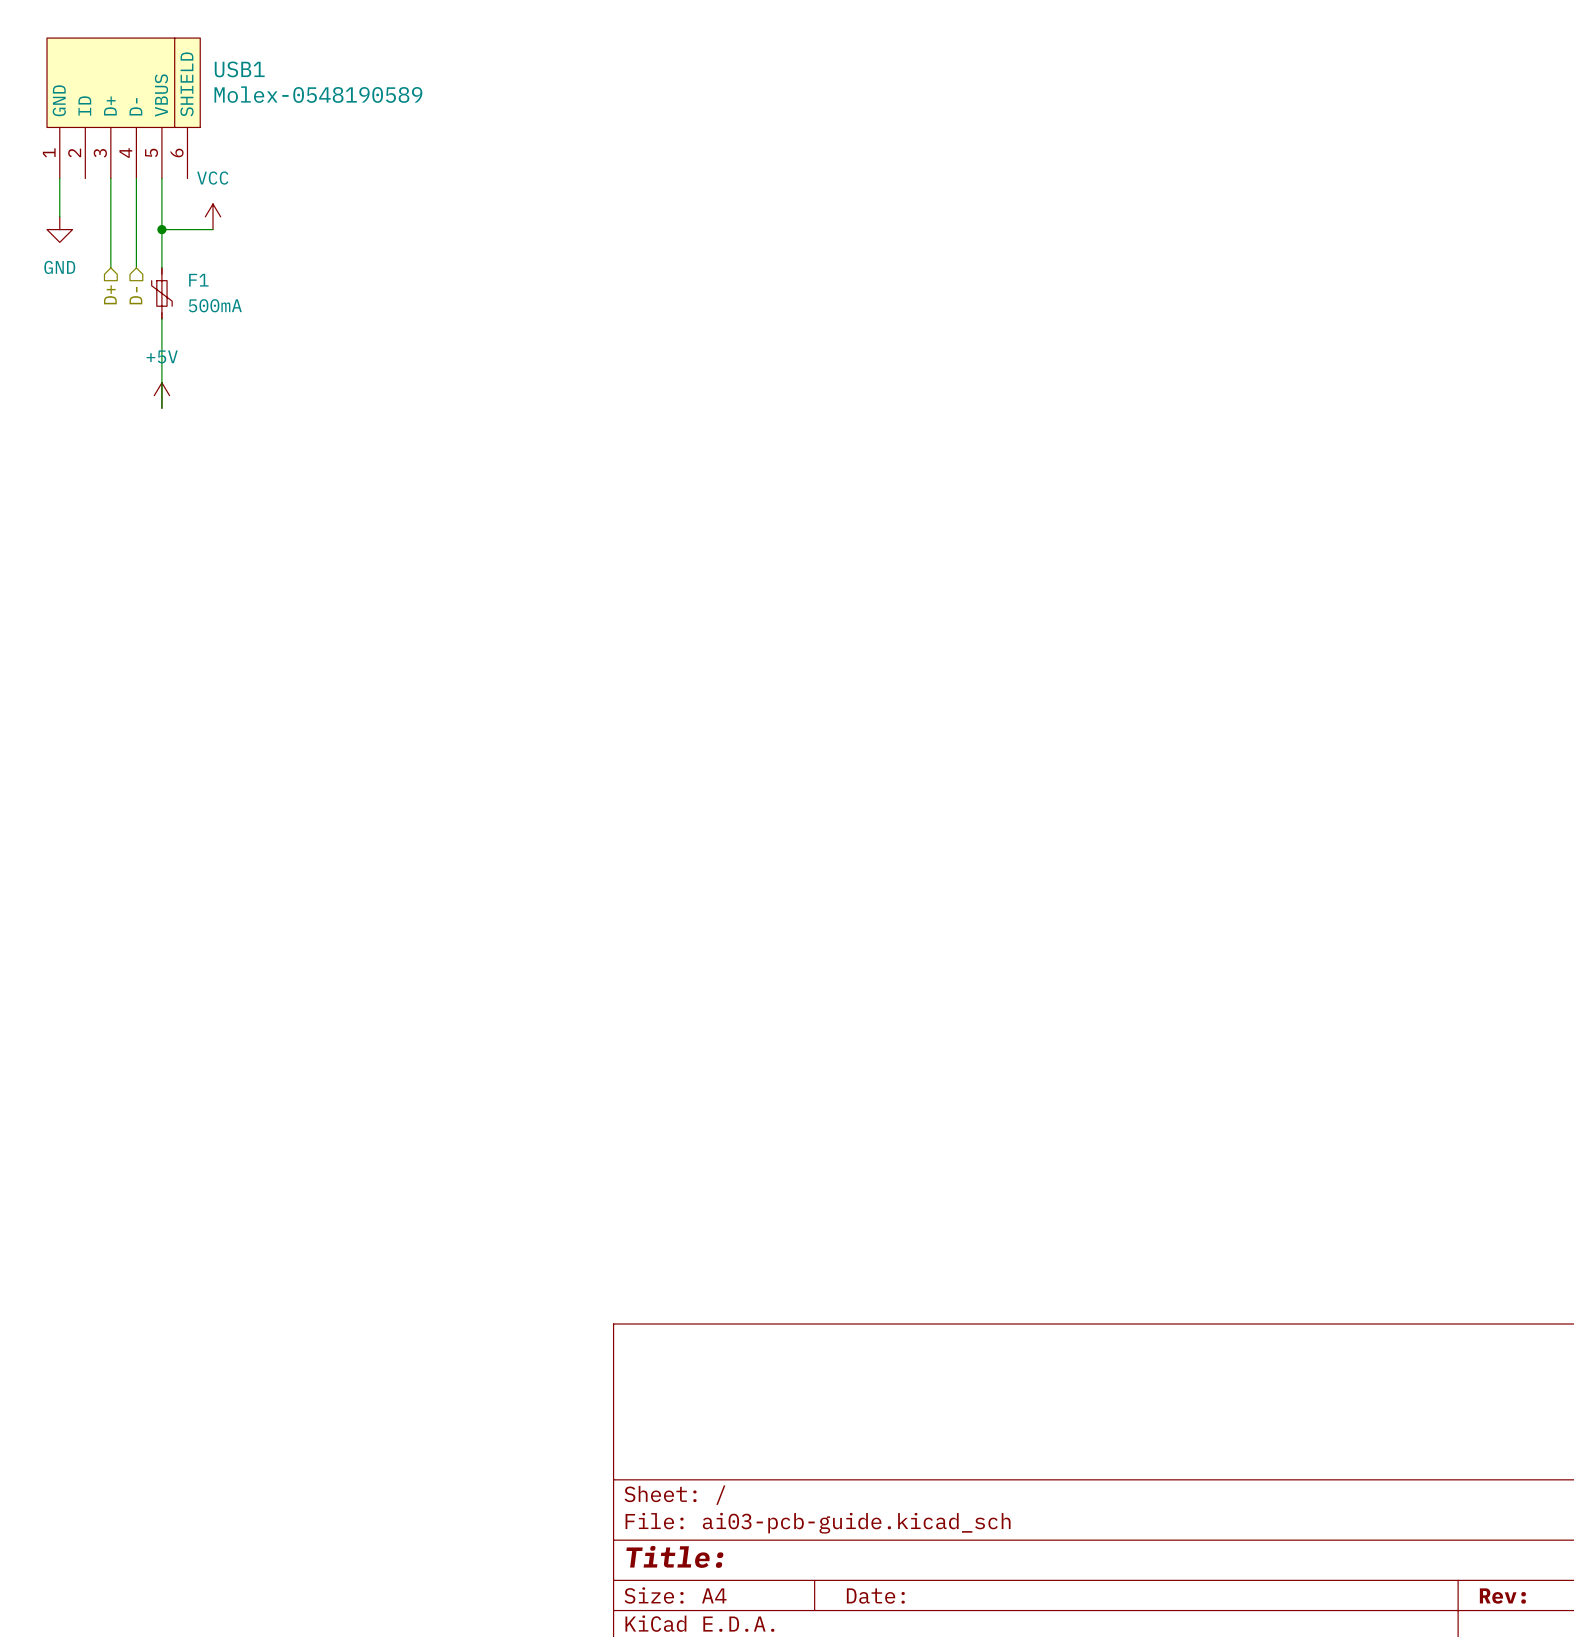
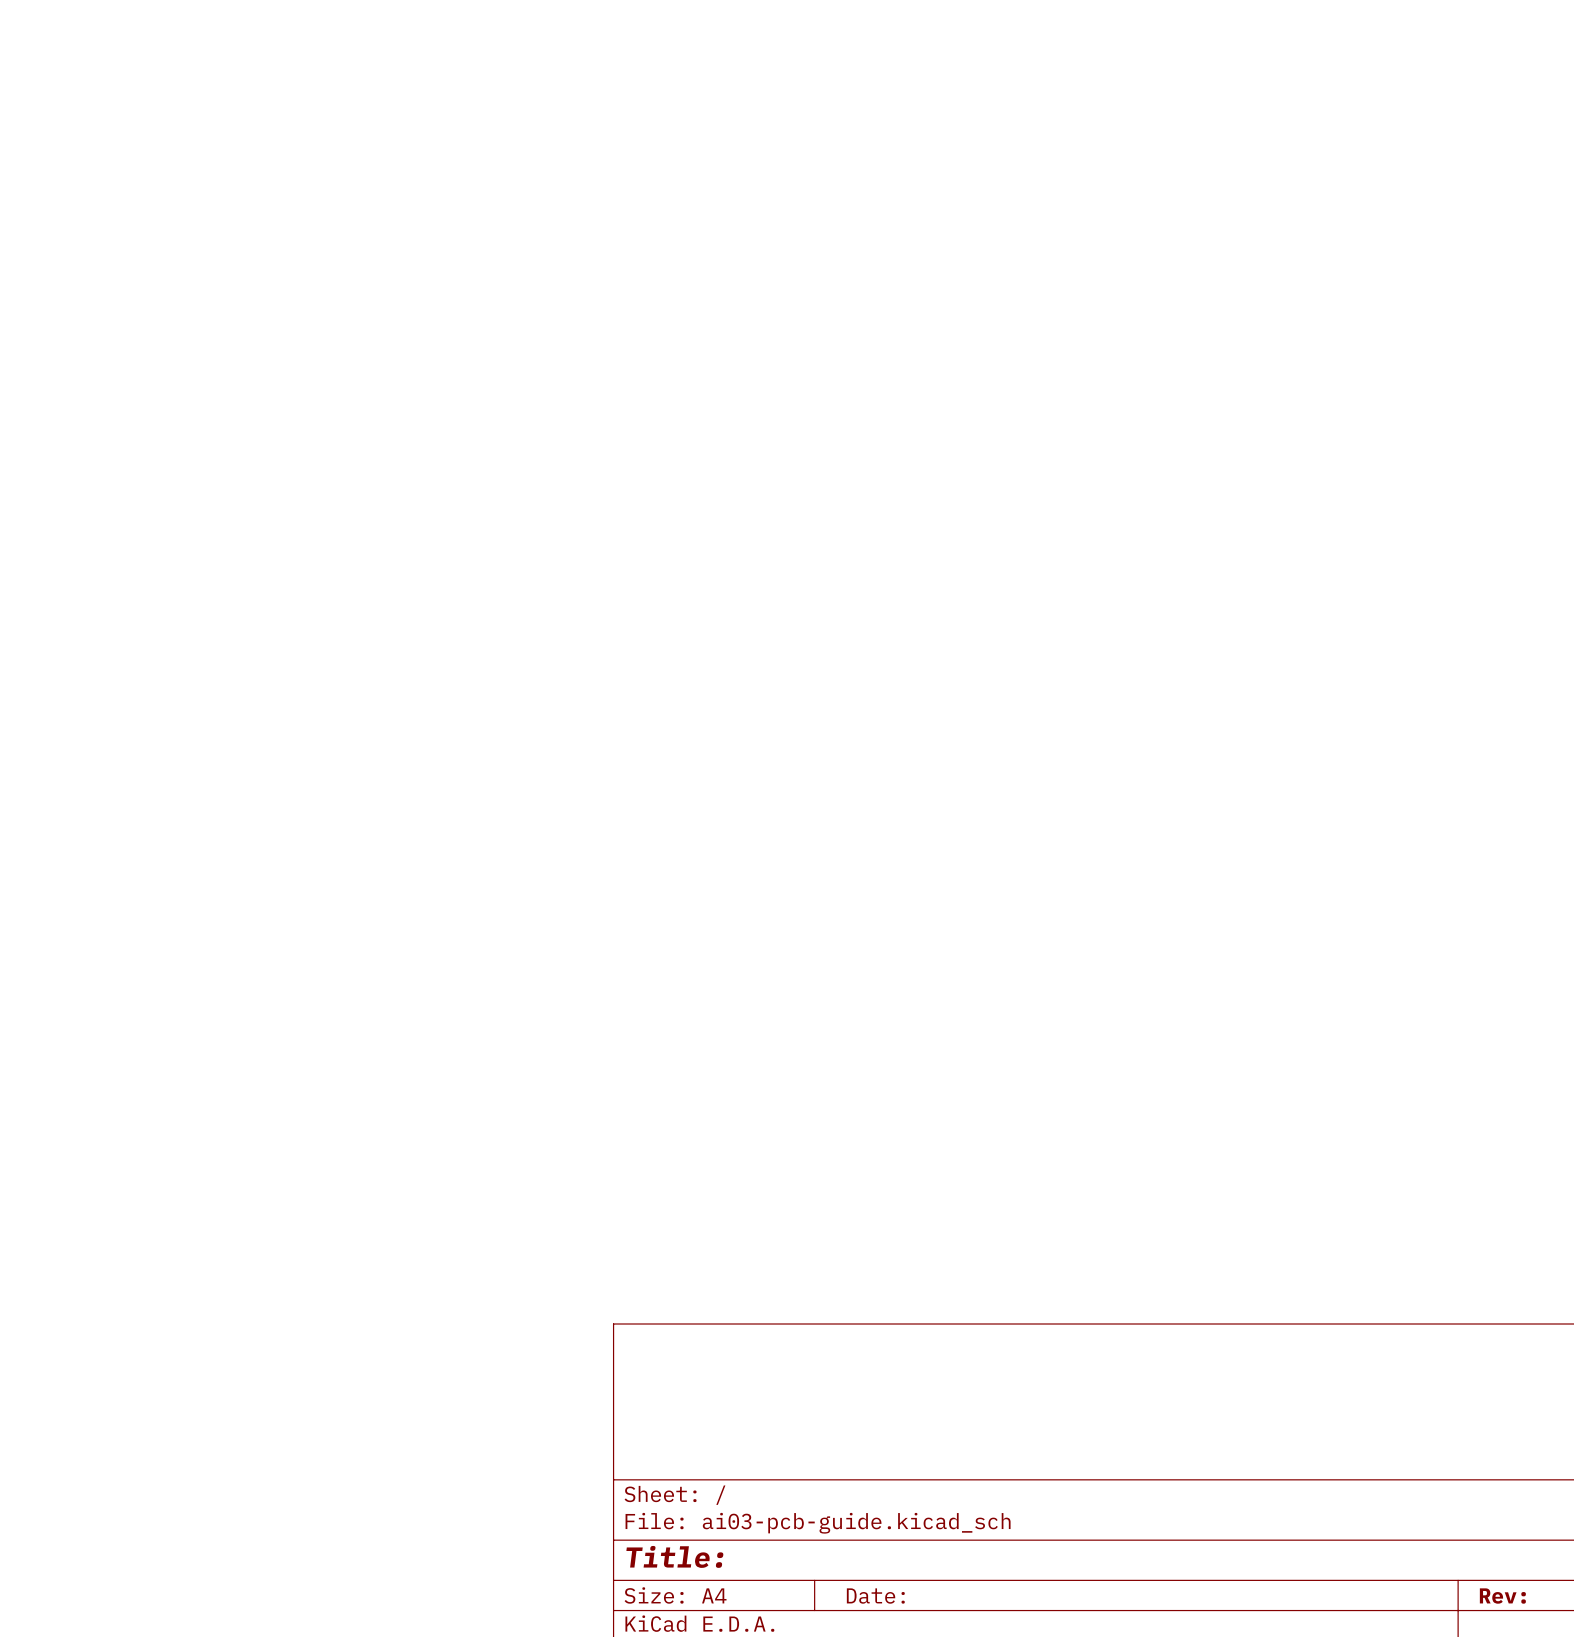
USB1: Molex-0548190589 (123, 108) -> none
wire: (59, 178) (59, 216) -> none
wire: (110, 178) (110, 267) -> none
wire: (136, 178) (136, 267) -> none
wire: (161, 178) (161, 267) -> none
power symbol: VCC (213, 216) -> none
power symbol: GND (59, 229) -> none
wire: (161, 229) (213, 229) -> none
junction: (161, 229) -> none
F1: 500mA (161, 293) -> none
hierarchical label: D+ (110, 294) -> none
hierarchical label: D- (135, 295) -> none
wire: (161, 318) (161, 408) -> none
power symbol: +5V (161, 395) -> none

